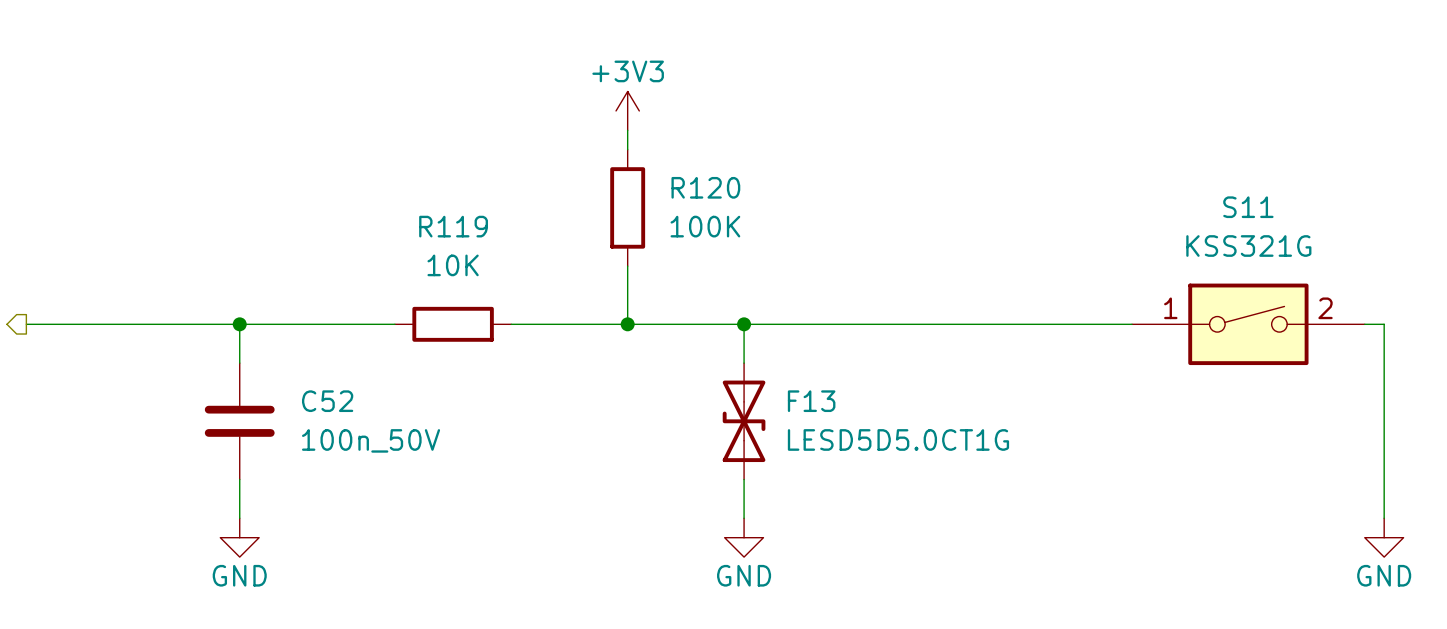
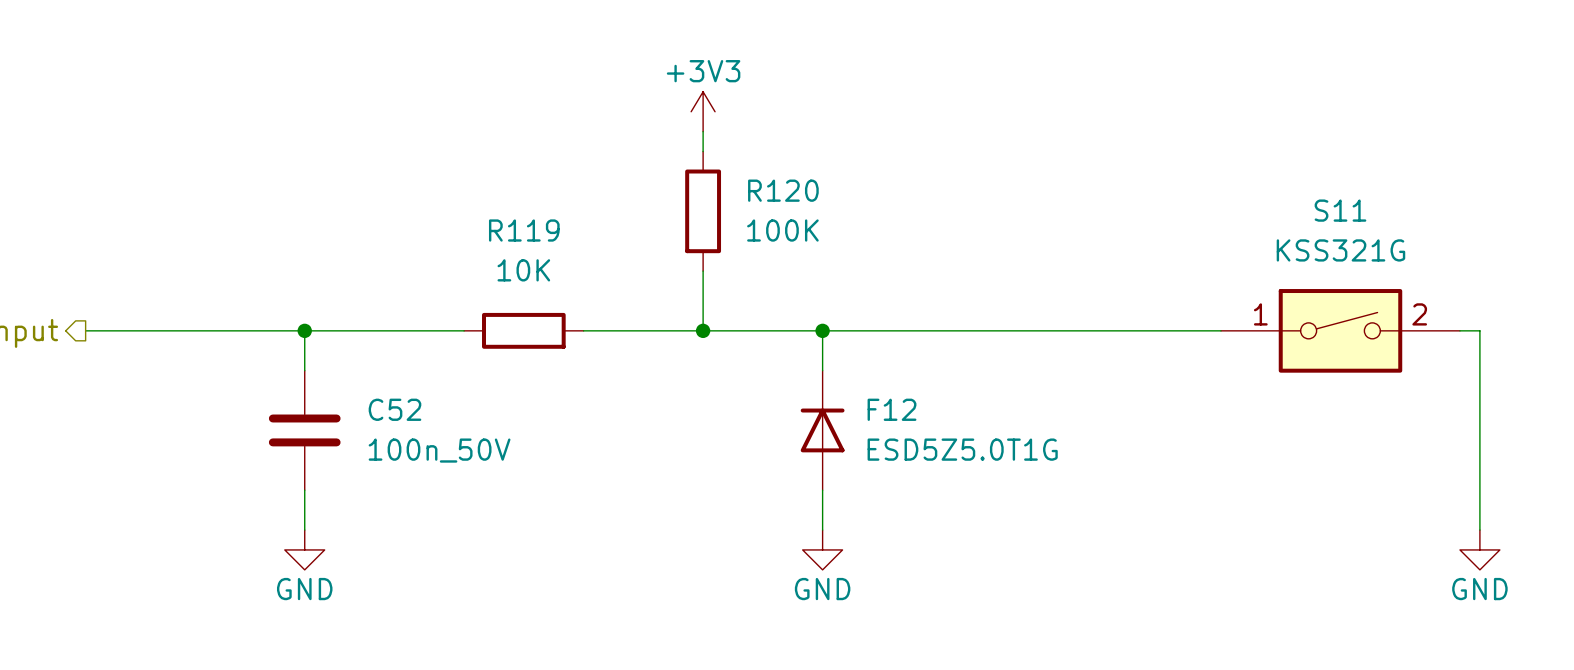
F13: LESD5D5.0CT1G (744, 421) -> none
F12: none -> ESD5Z5.0T1G (822, 430)

